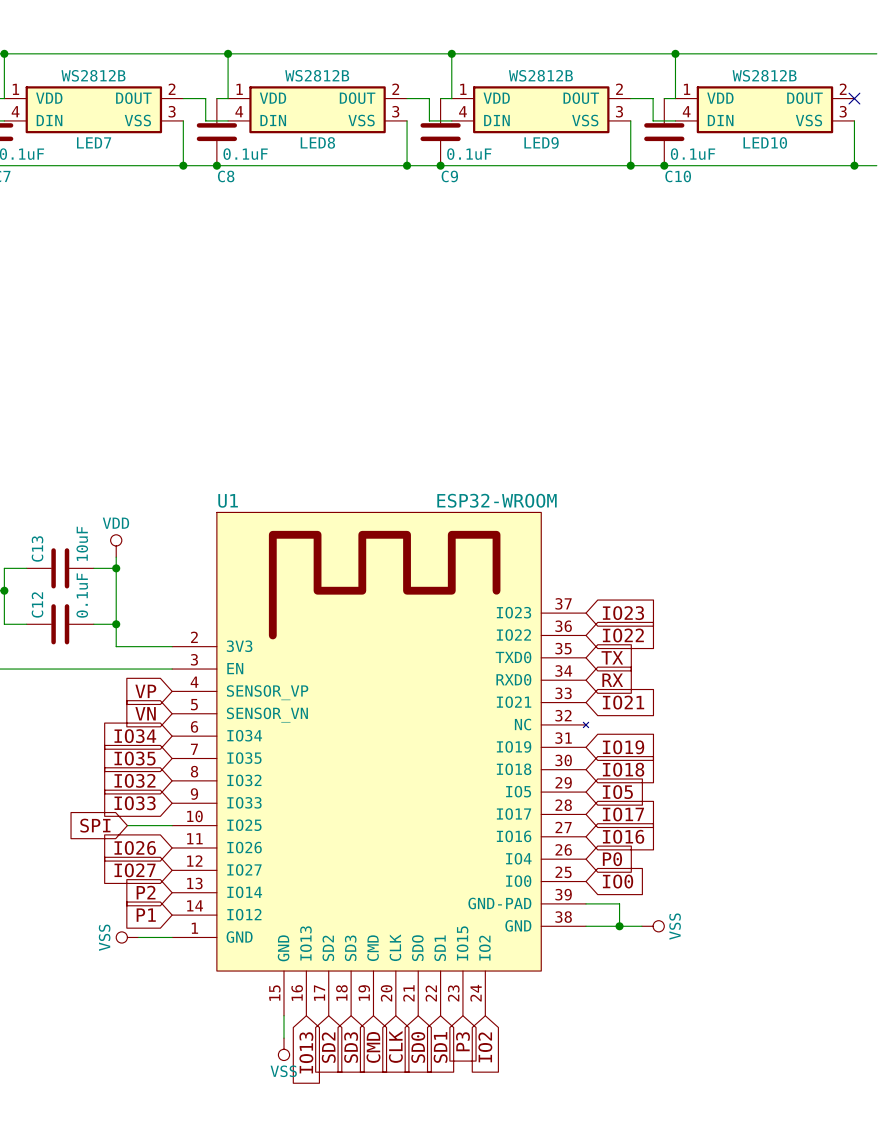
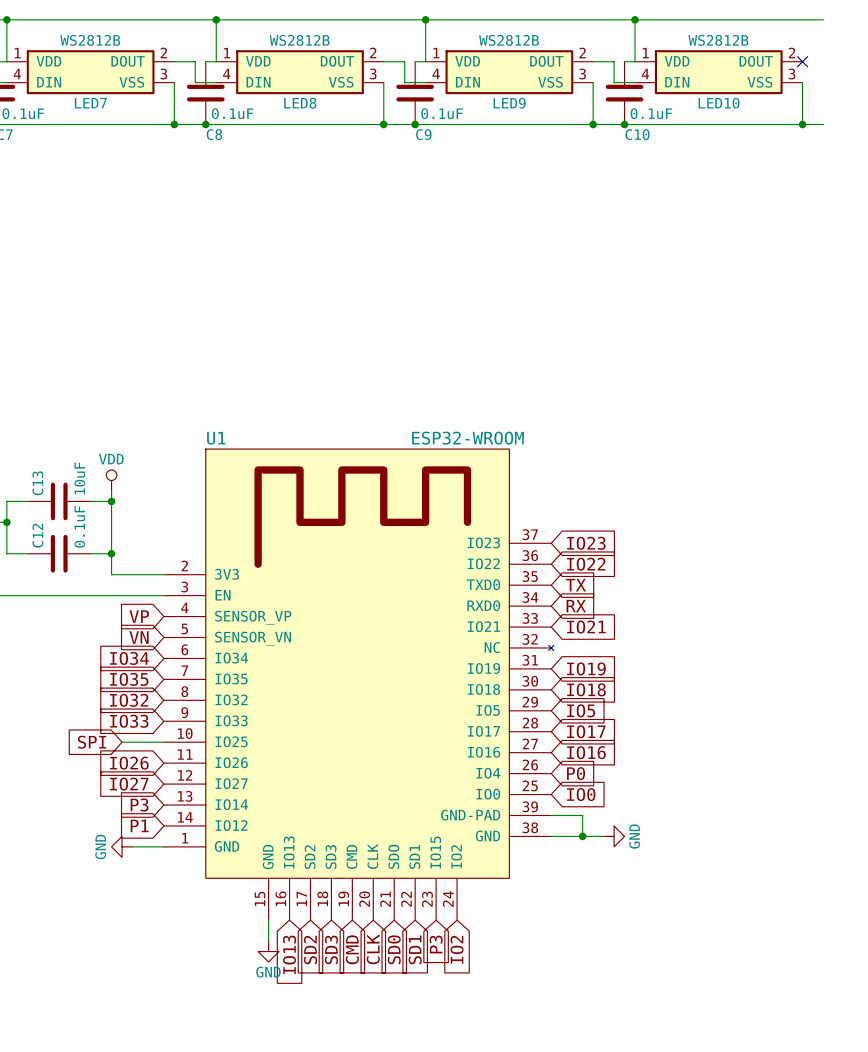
global label: P2 (146, 892) -> P3 (139, 805)
power symbol: VSS (653, 926) -> GND (614, 836)
power symbol: VSS (127, 937) -> GND (122, 846)
power symbol: VSS (284, 1049) -> GND (268, 951)

